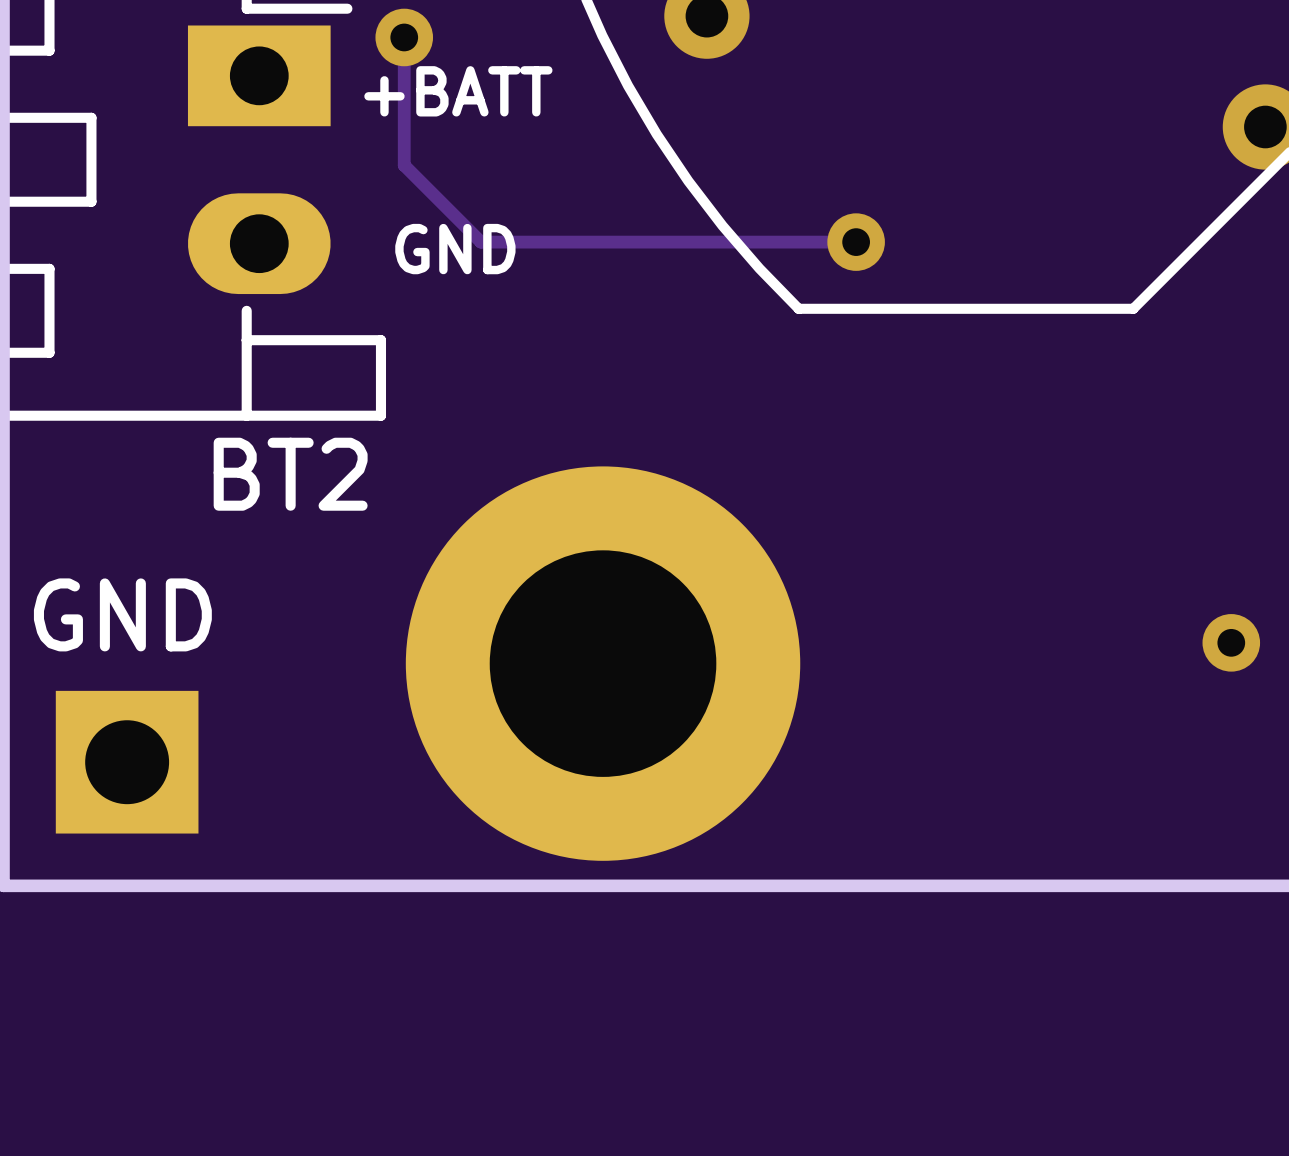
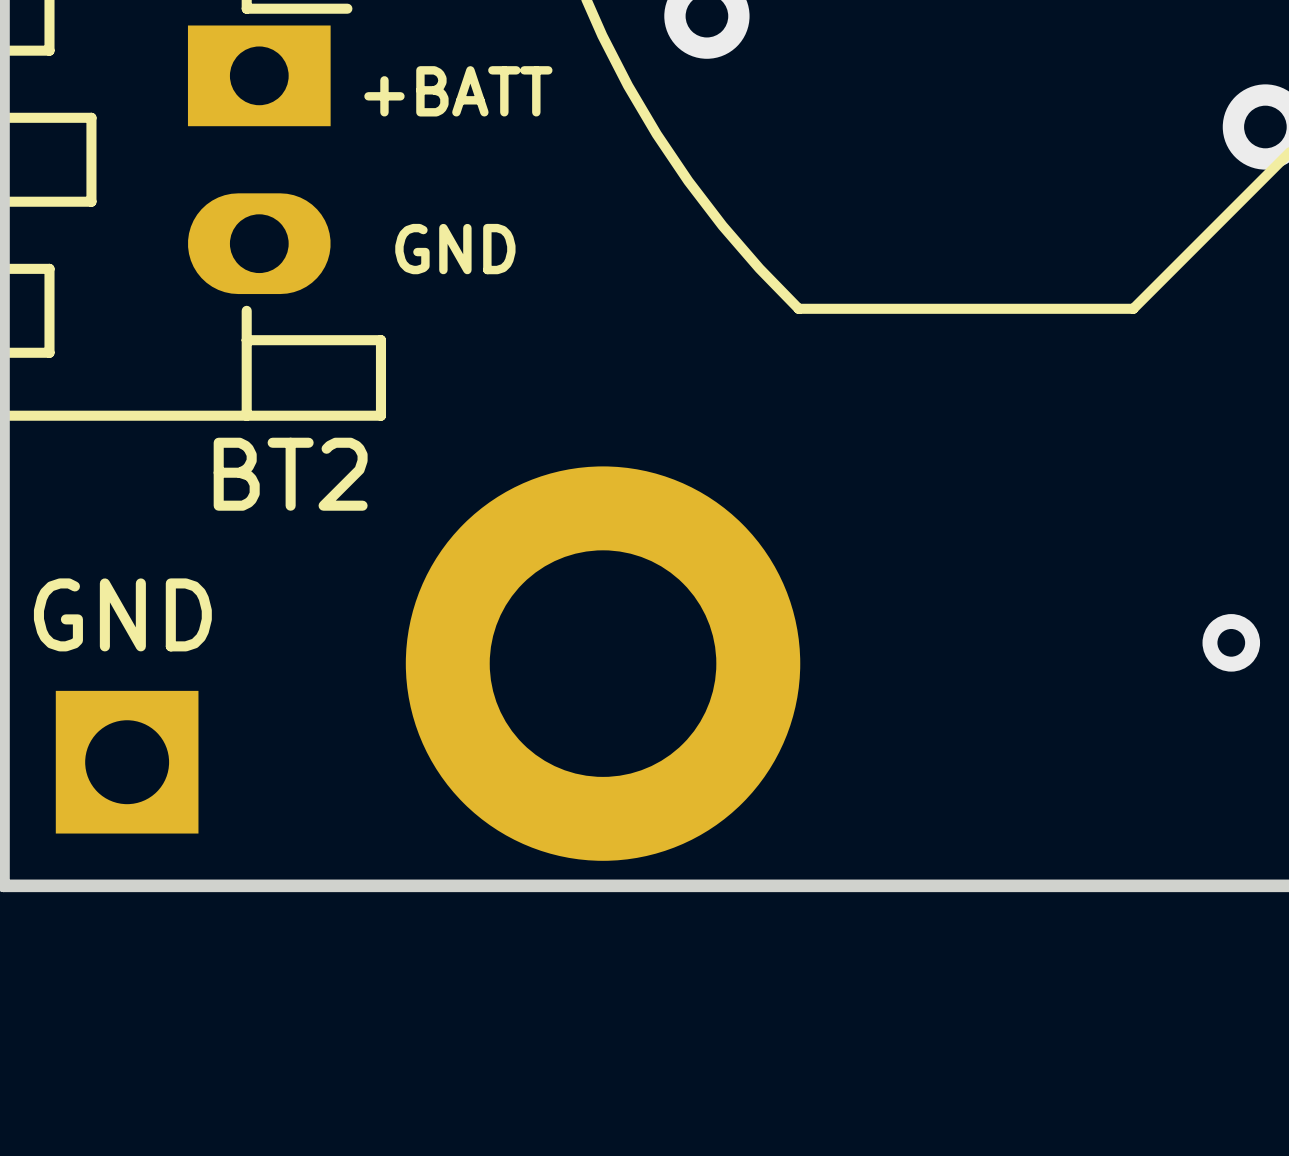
track: (404, 37) (404, 165) (480, 242) (856, 242) -> none
via: (404, 37) -> none
via: (856, 242) -> none

